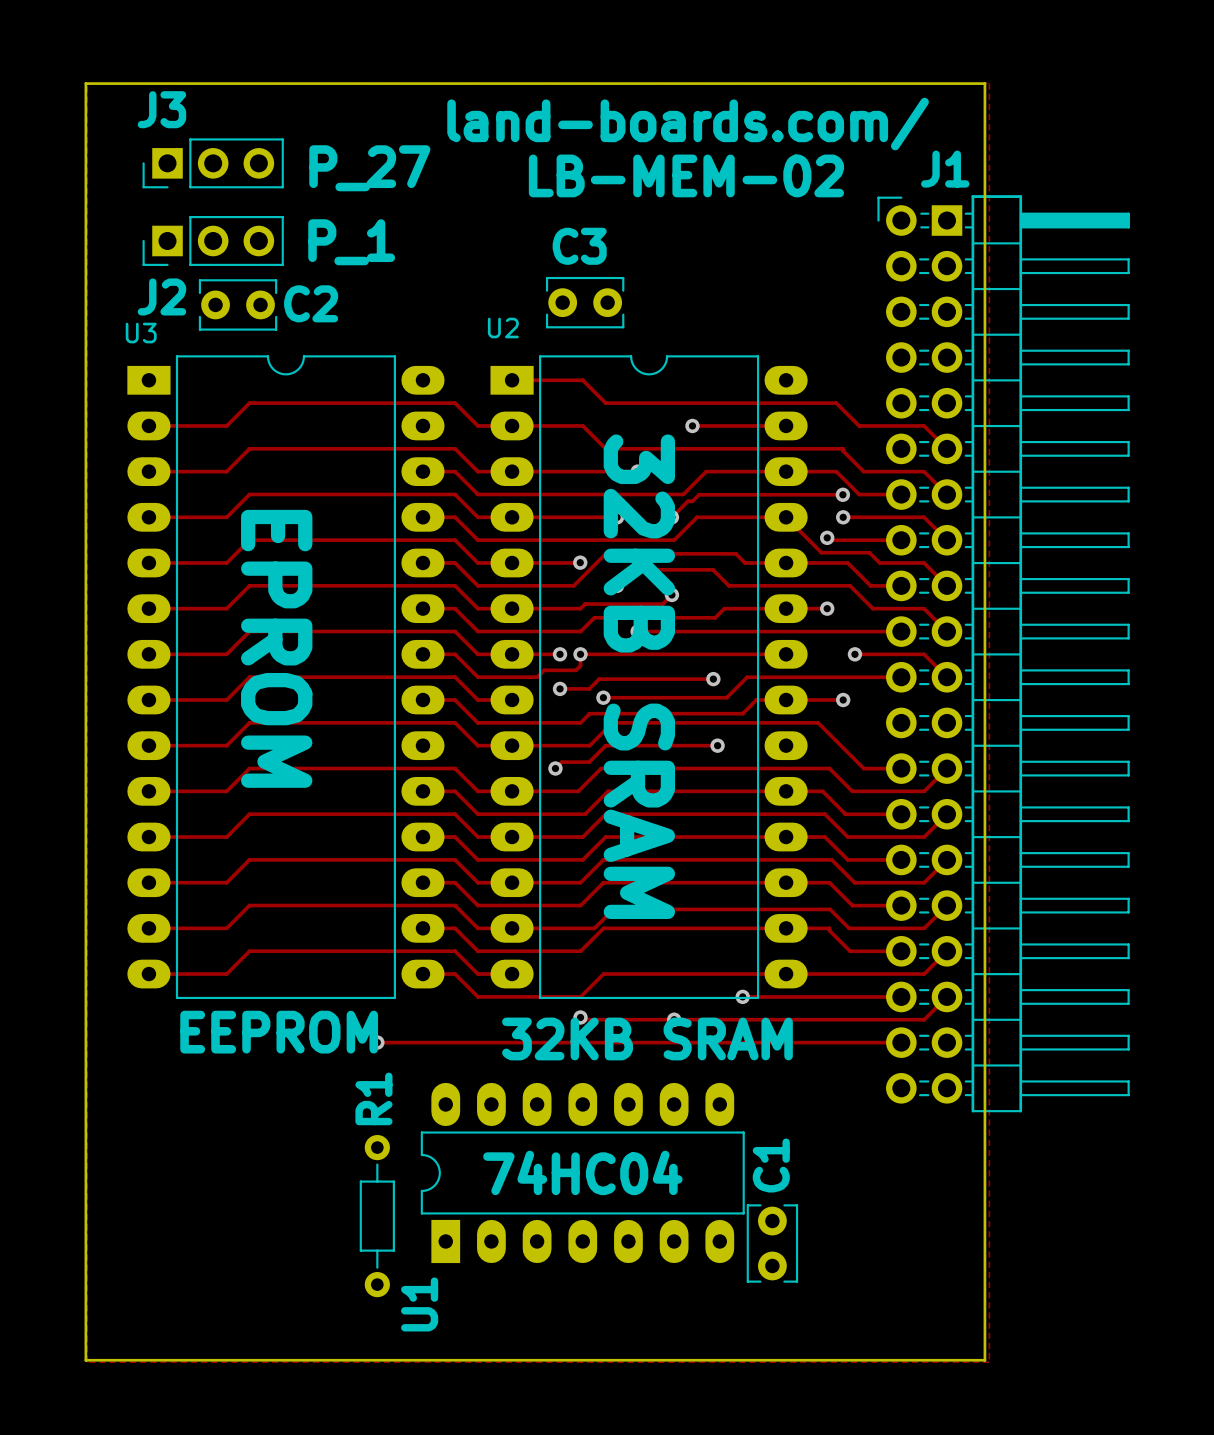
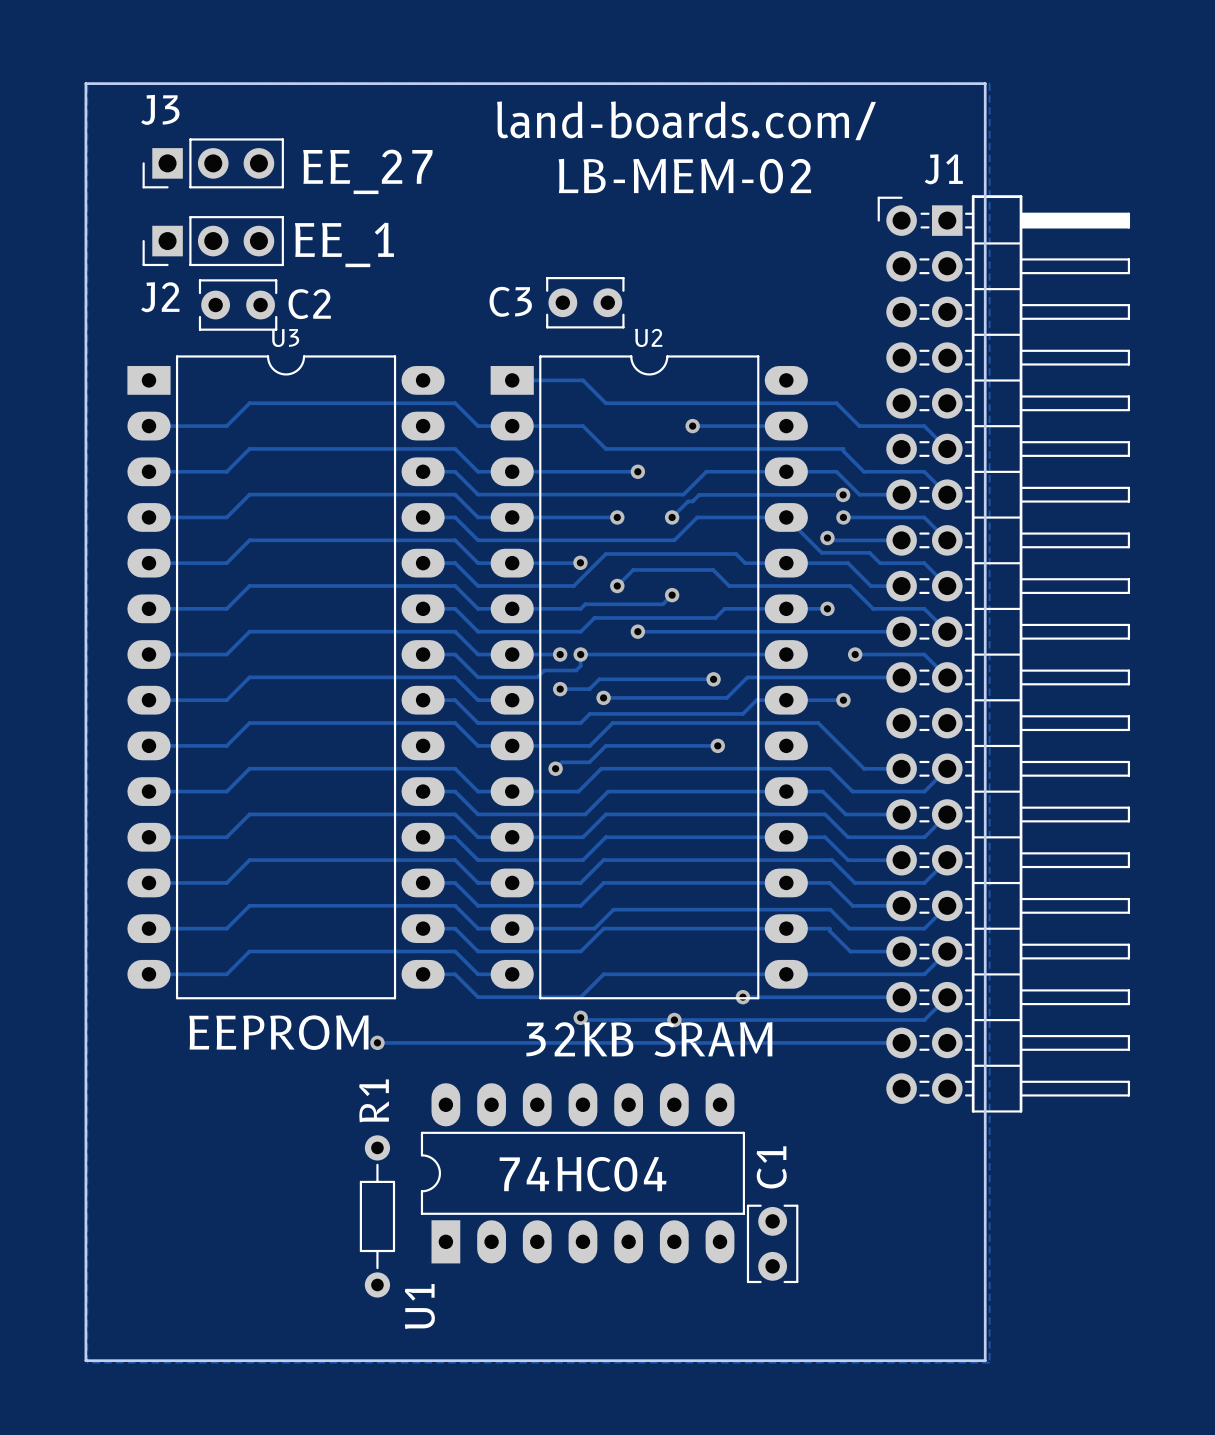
text: P_27 (369, 168) -> EE_27 (367, 171)
text: P_1 (351, 242) -> EE_1 (344, 244)
C3 name position: C3 (579, 246) -> C3 (510, 301)
U2 name position: U2 (503, 328) -> U2 (648, 337)
U3 name position: U3 (141, 333) -> U3 (285, 337)
text: EPROM (276, 648) -> none
text: 32KB SRAM (639, 676) -> none

